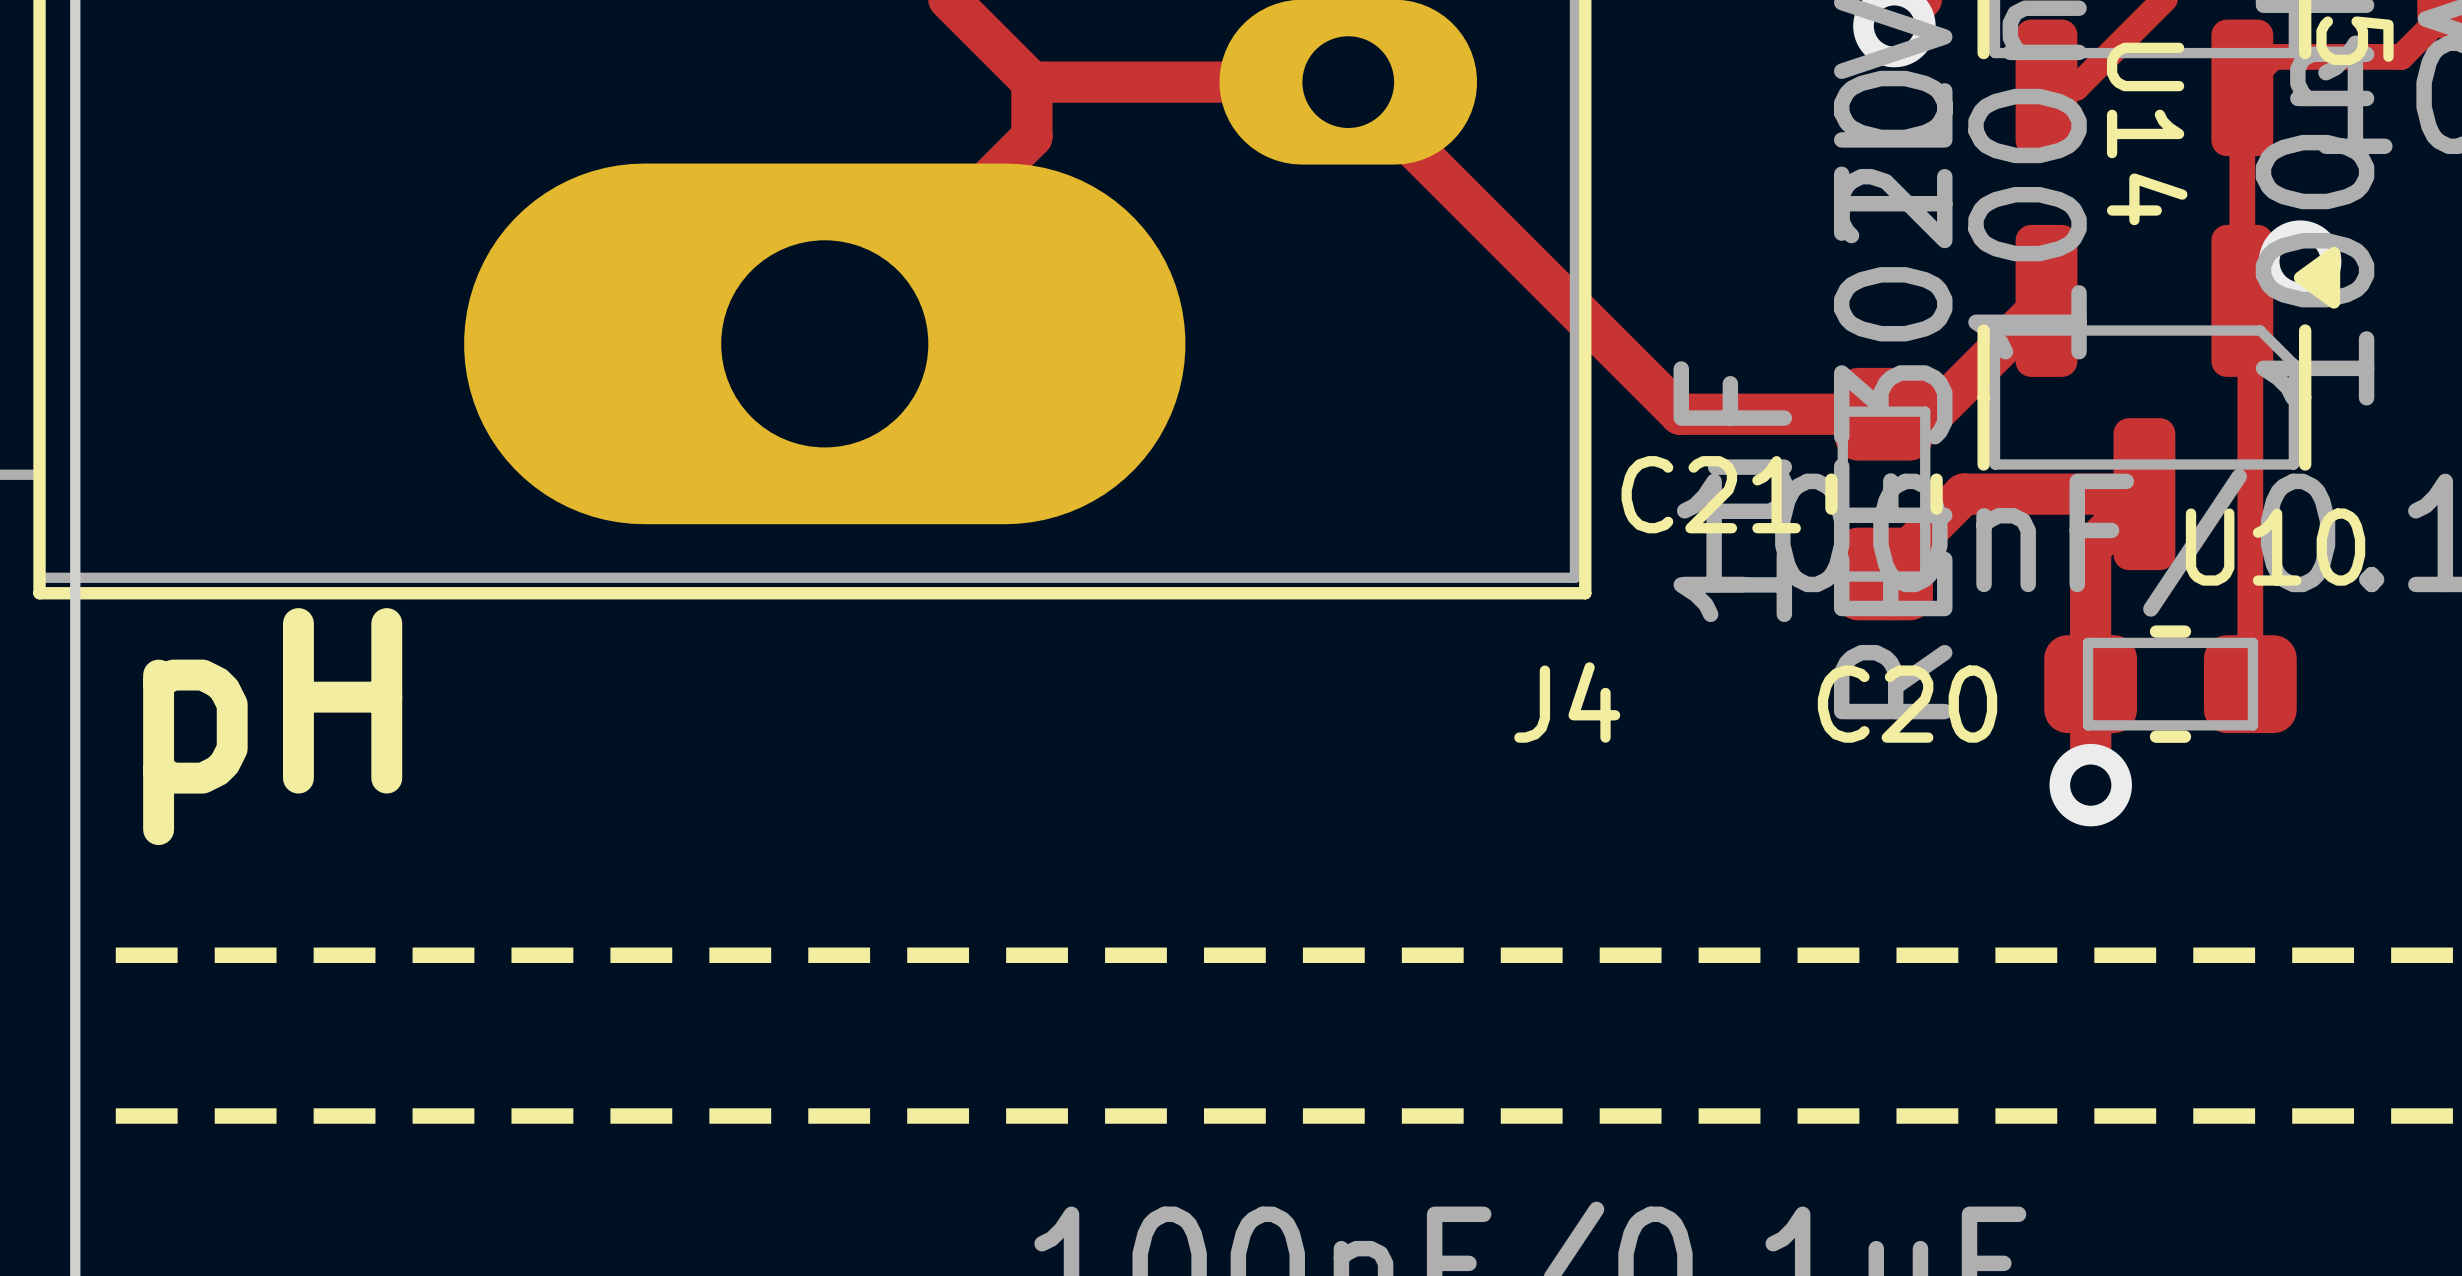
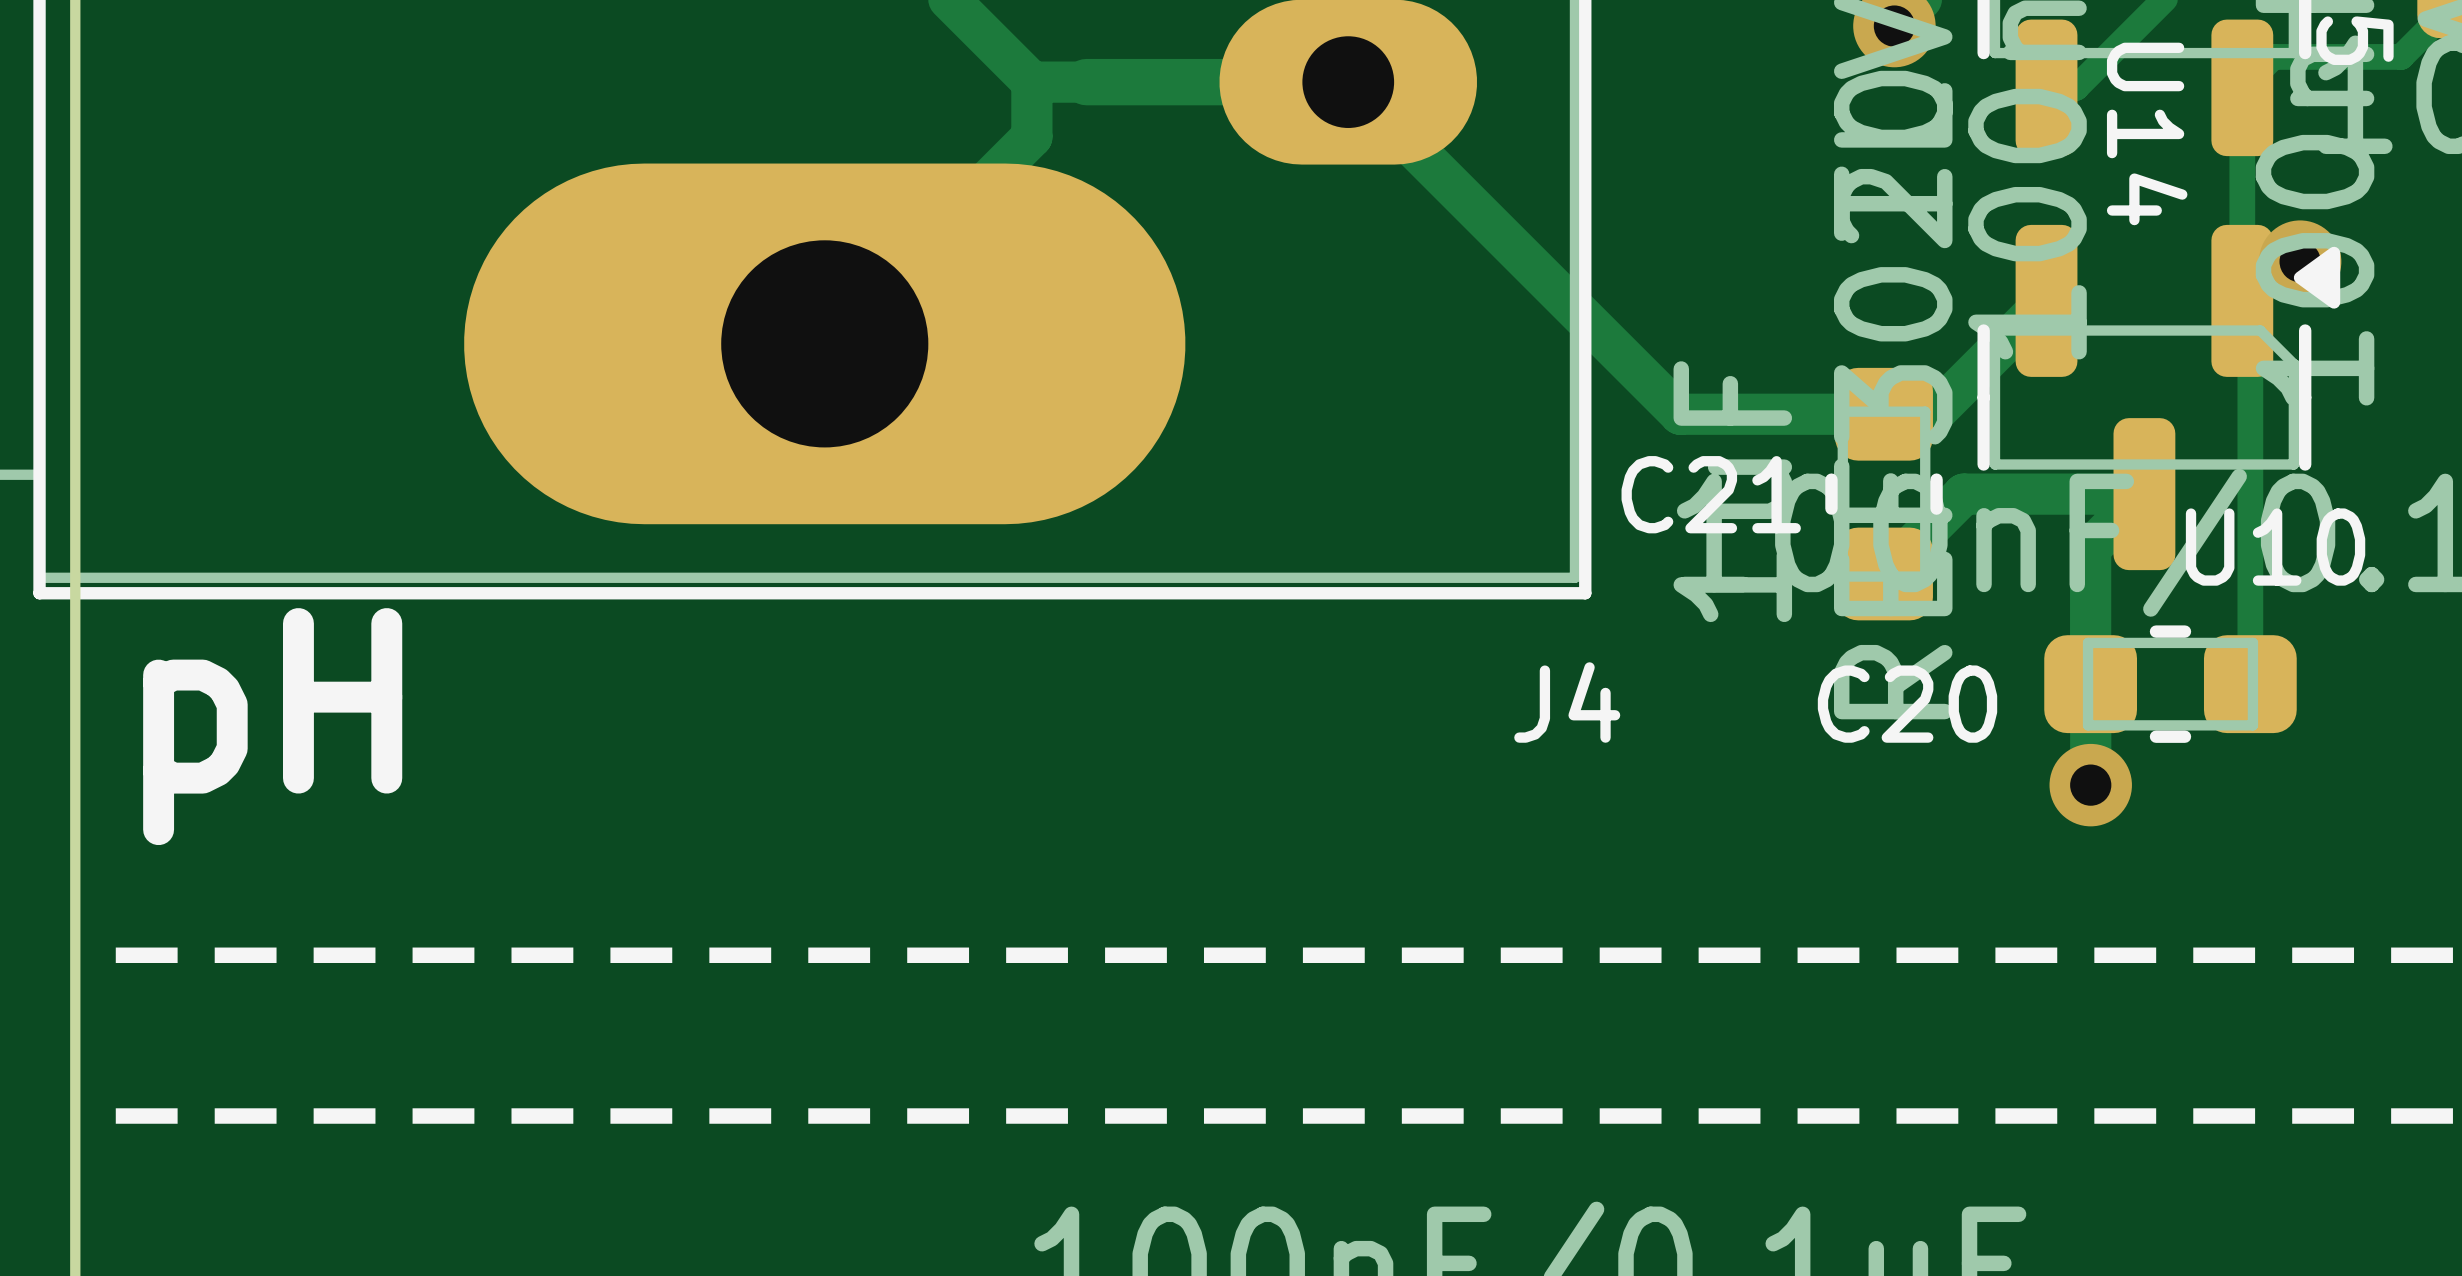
track width: thin (1086, 82) (1348, 82) -> thick (1086, 82) (1348, 82)

